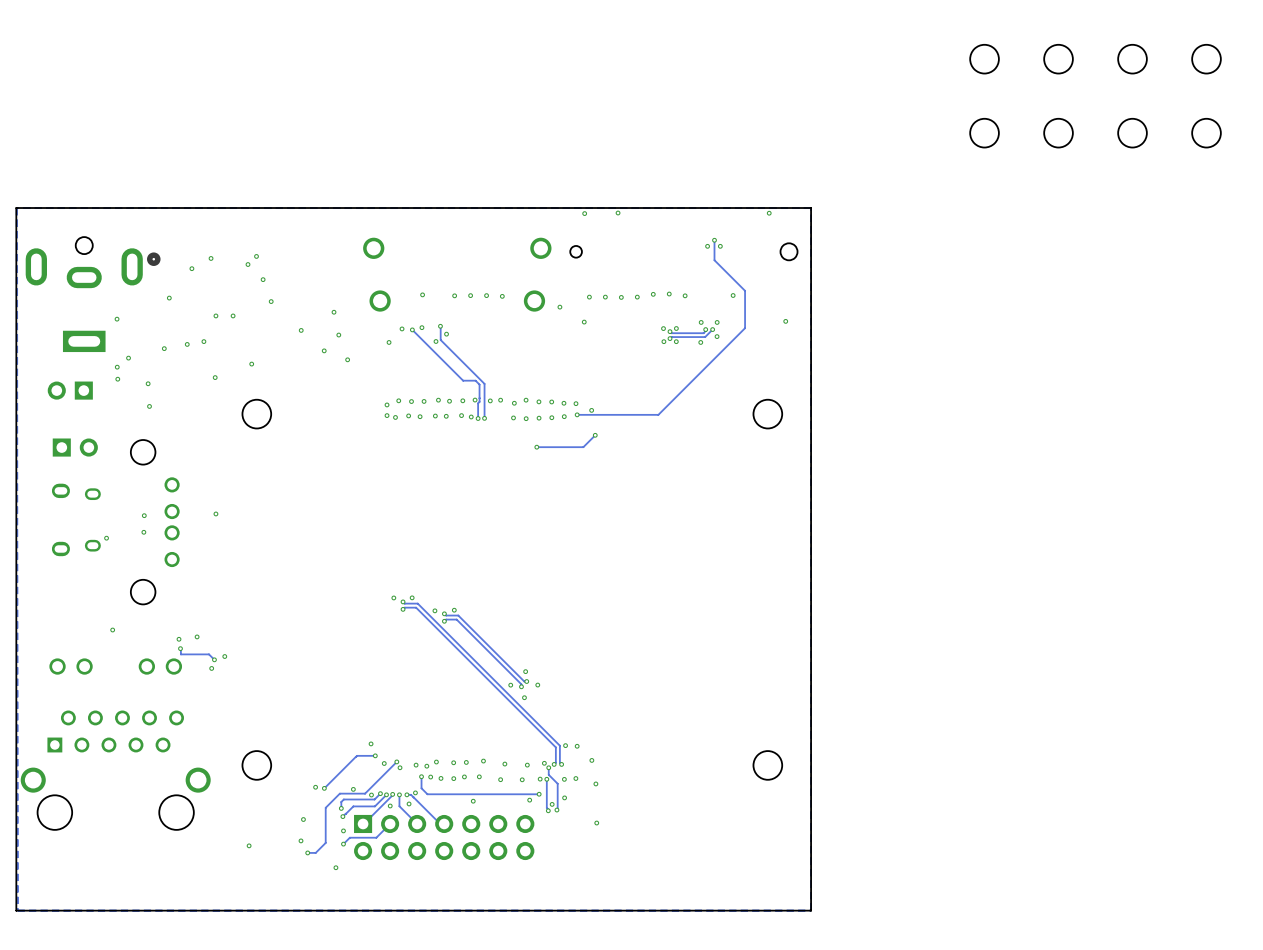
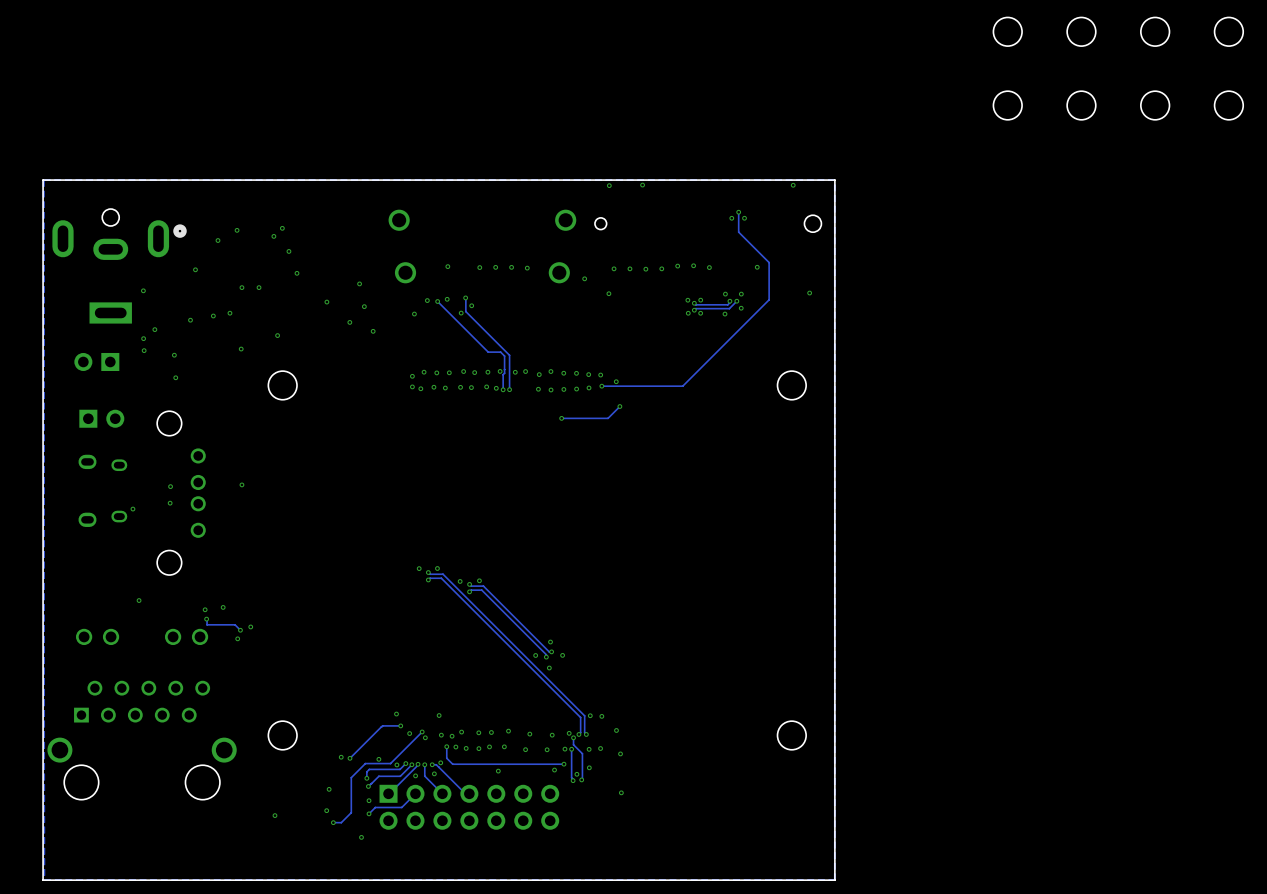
via: none -> (439, 715)

